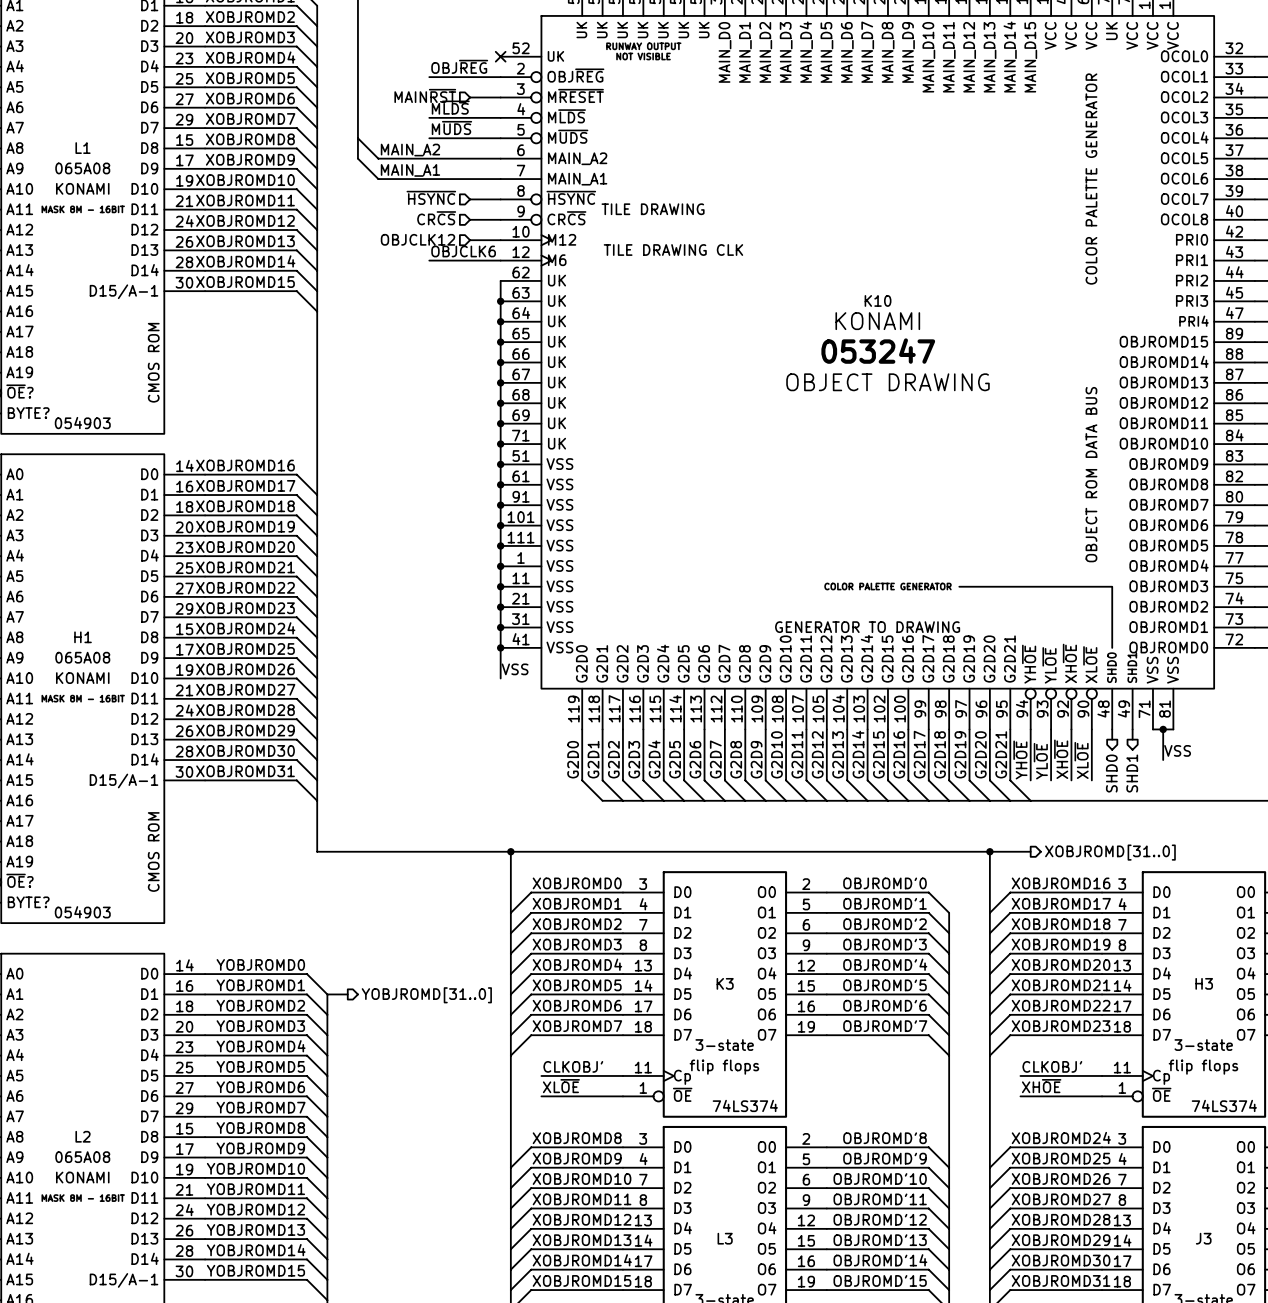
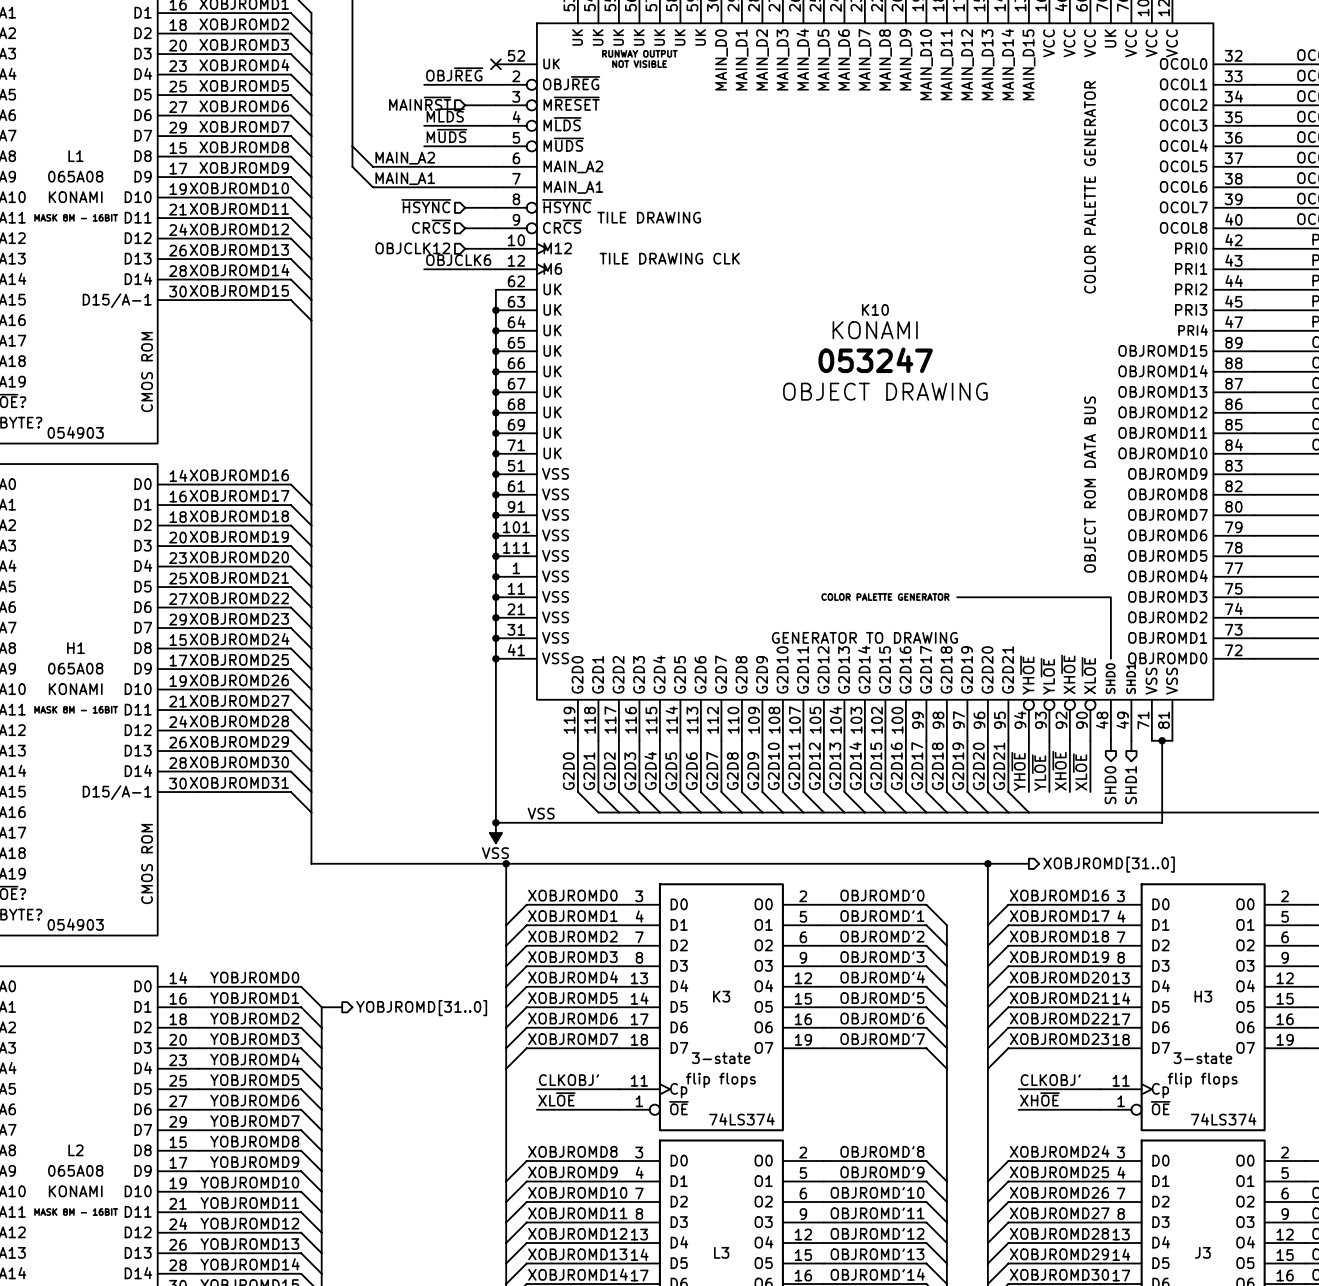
label position: VSS (515, 669) -> VSS (541, 813)
wire: none -> (495, 689) (495, 822) (1162, 822) (1162, 771)
label: VSS (1177, 750) -> none
junction: none -> (495, 822)
power symbol: none -> VSS (495, 833)

